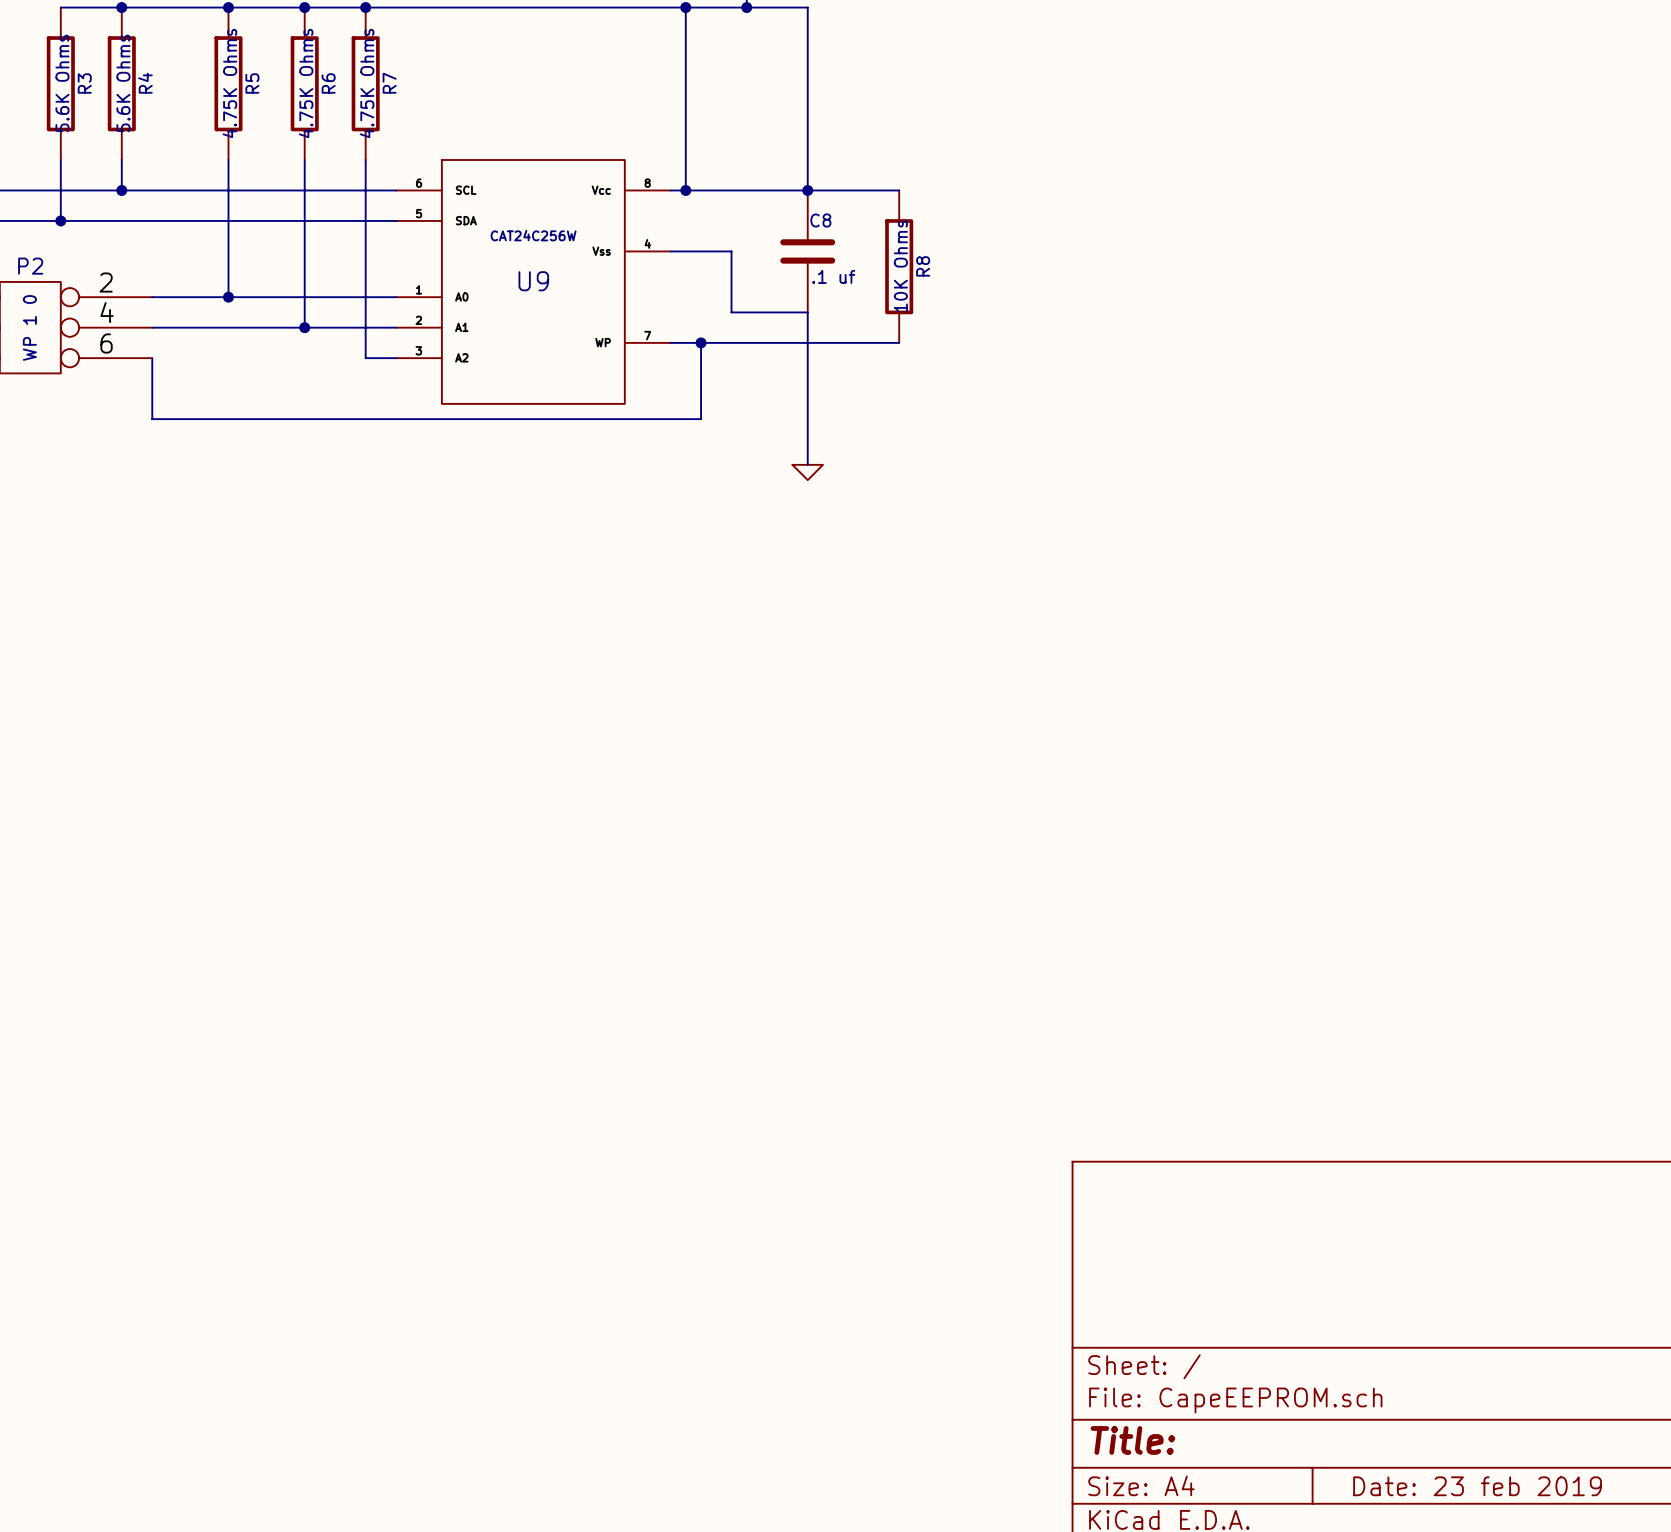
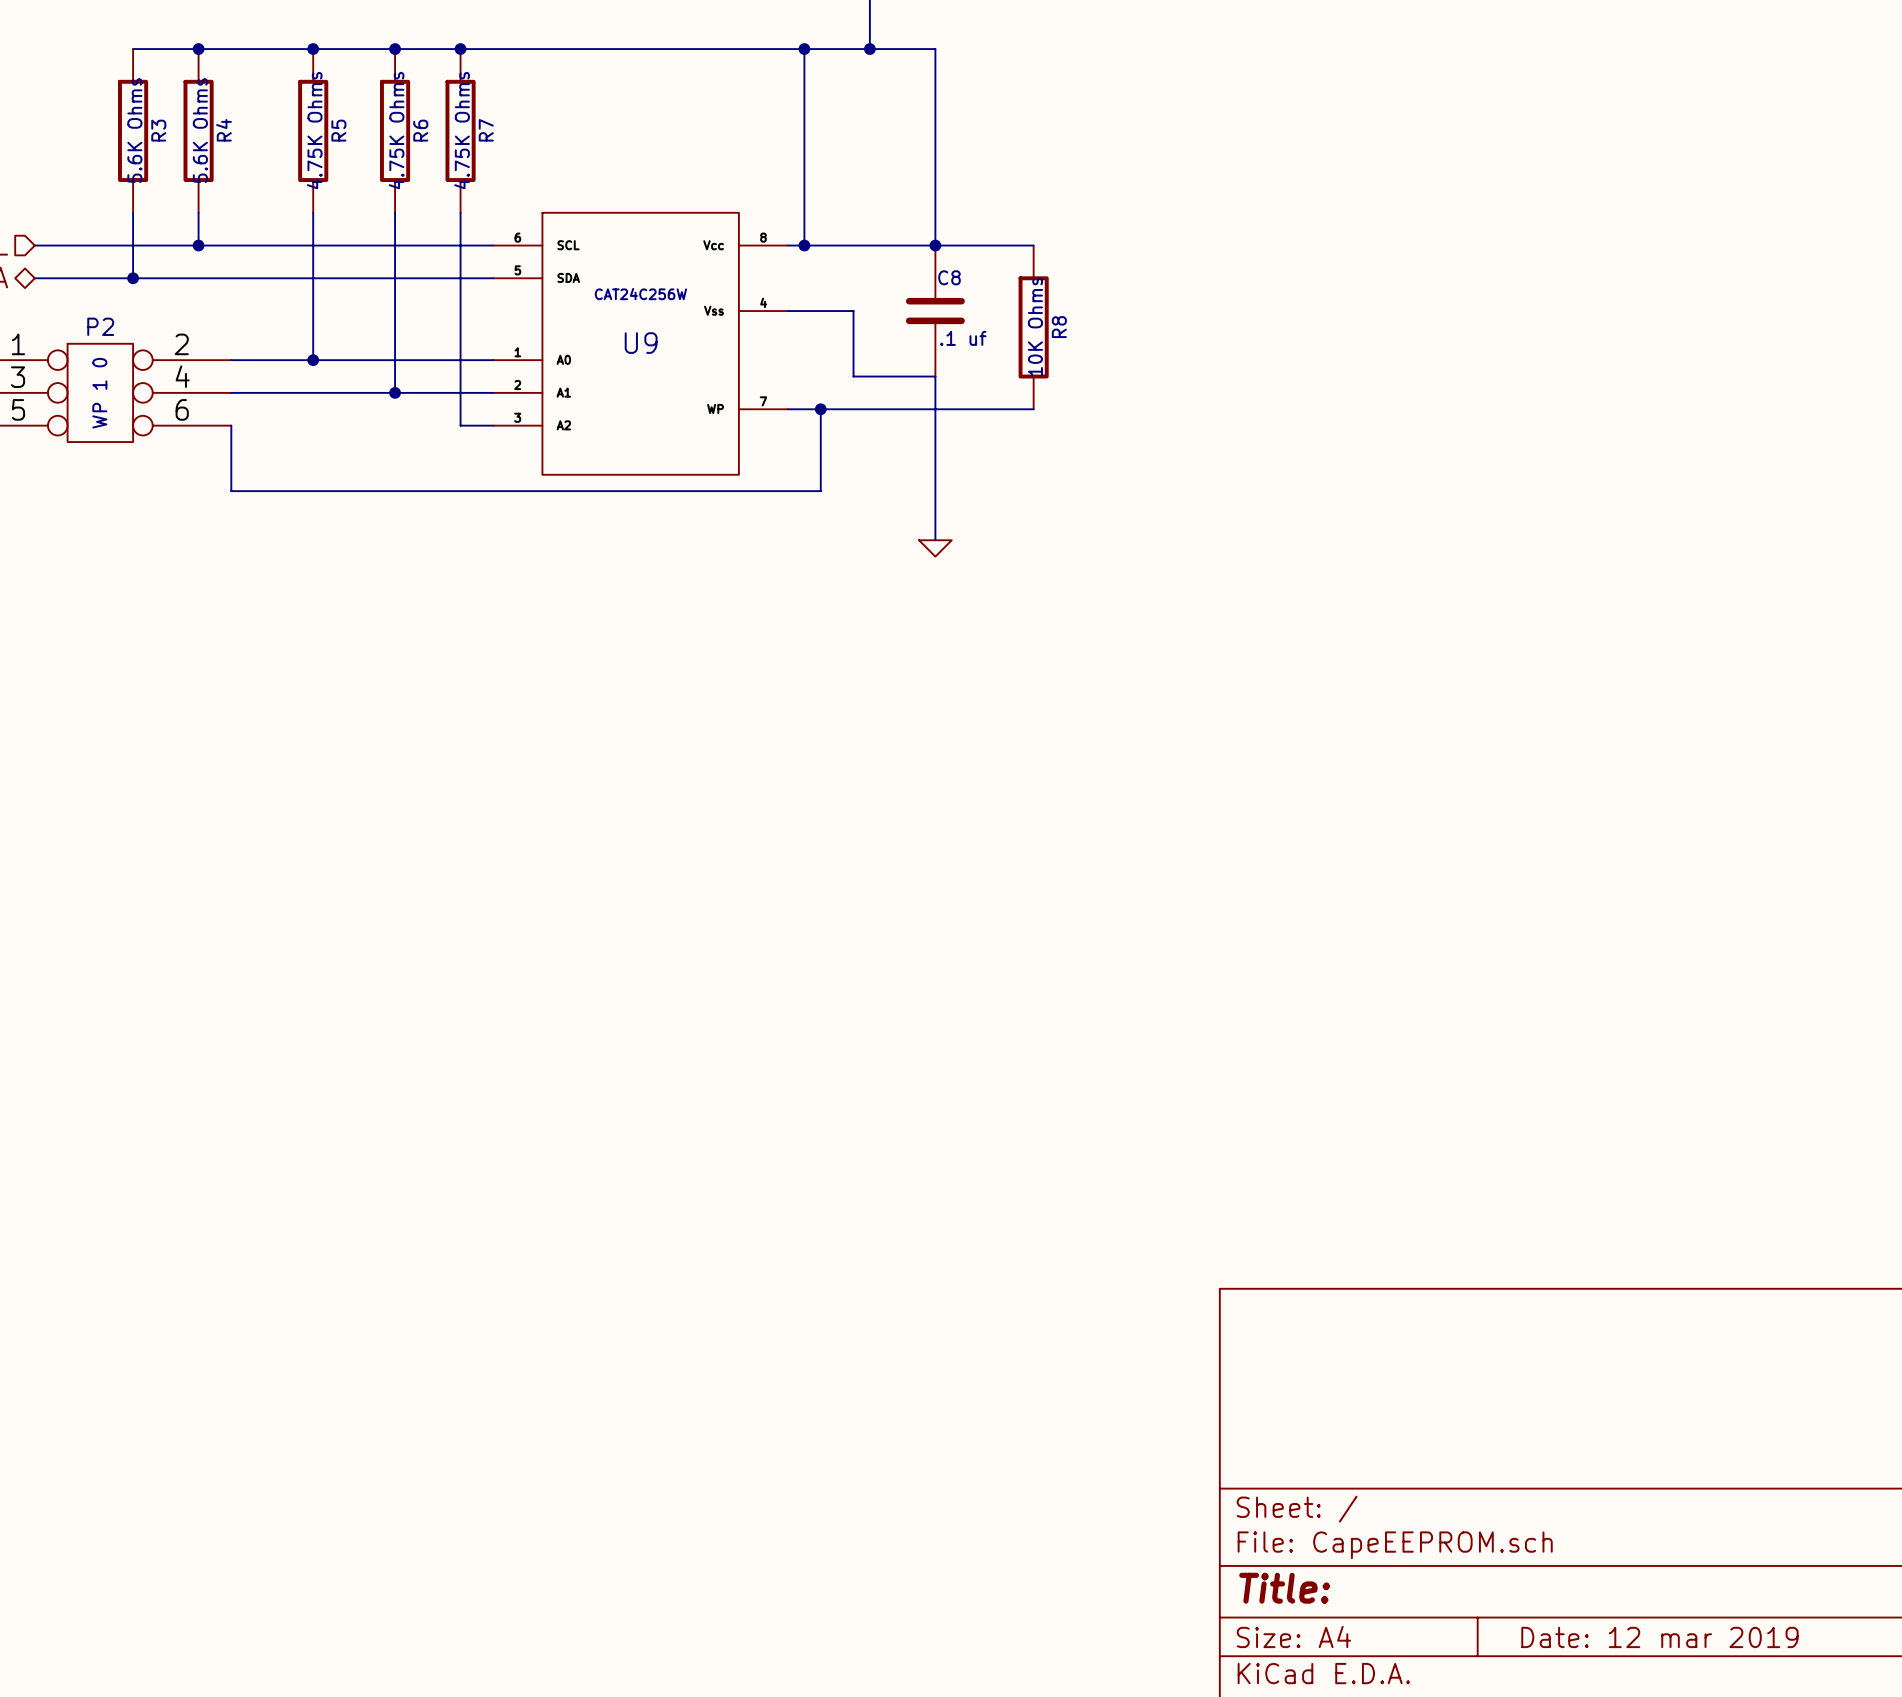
title block: Date: 23 feb 2019 (1477, 1486) -> Date: 12 mar 2019 (1659, 1637)

